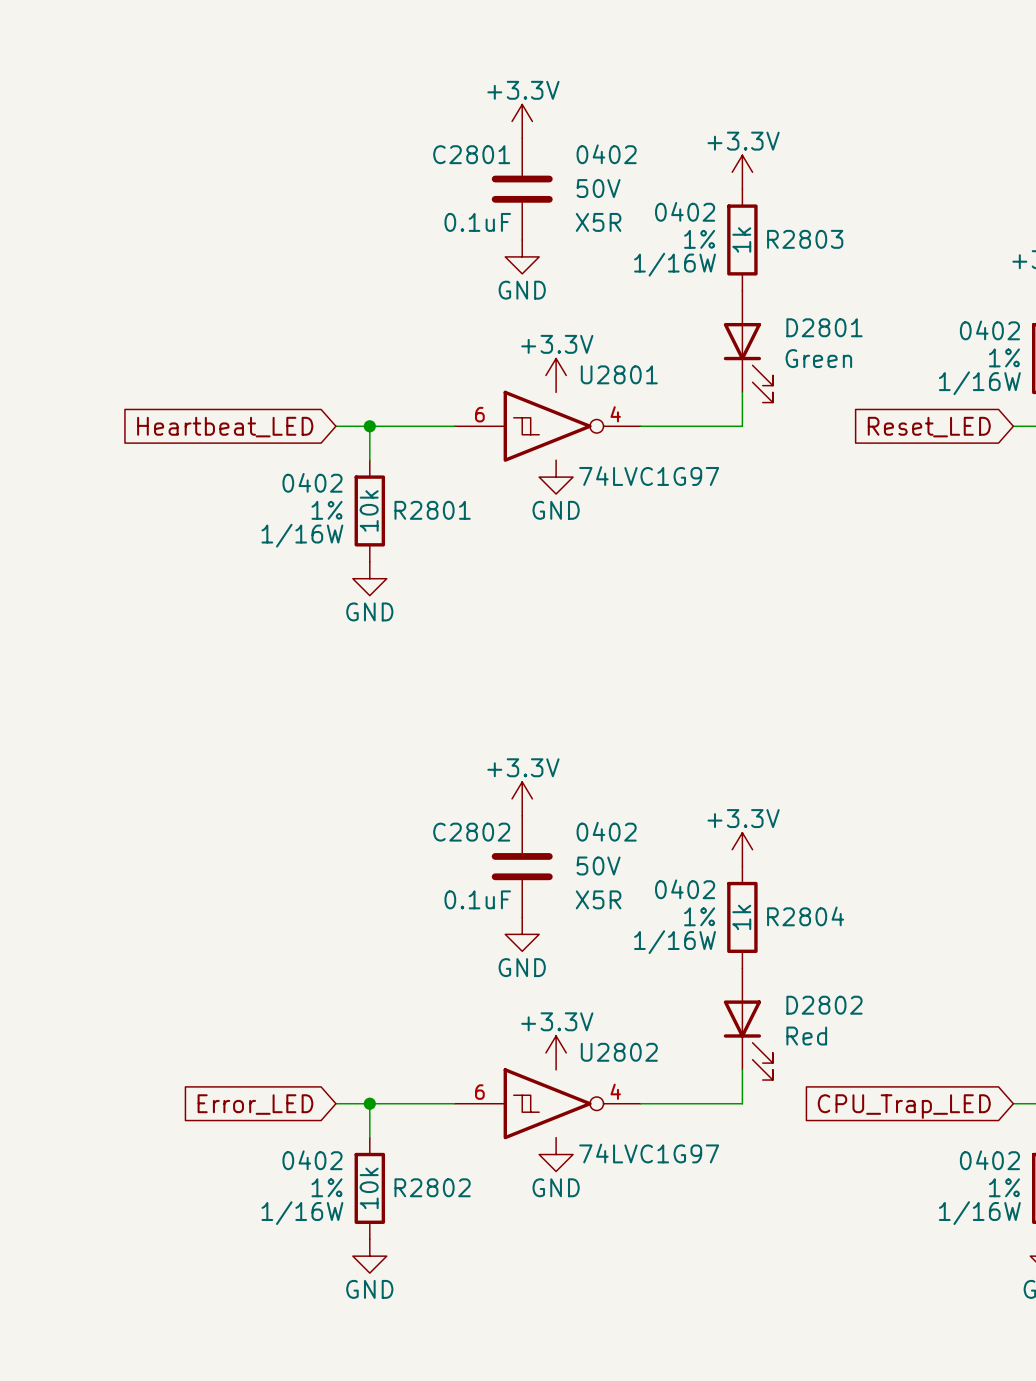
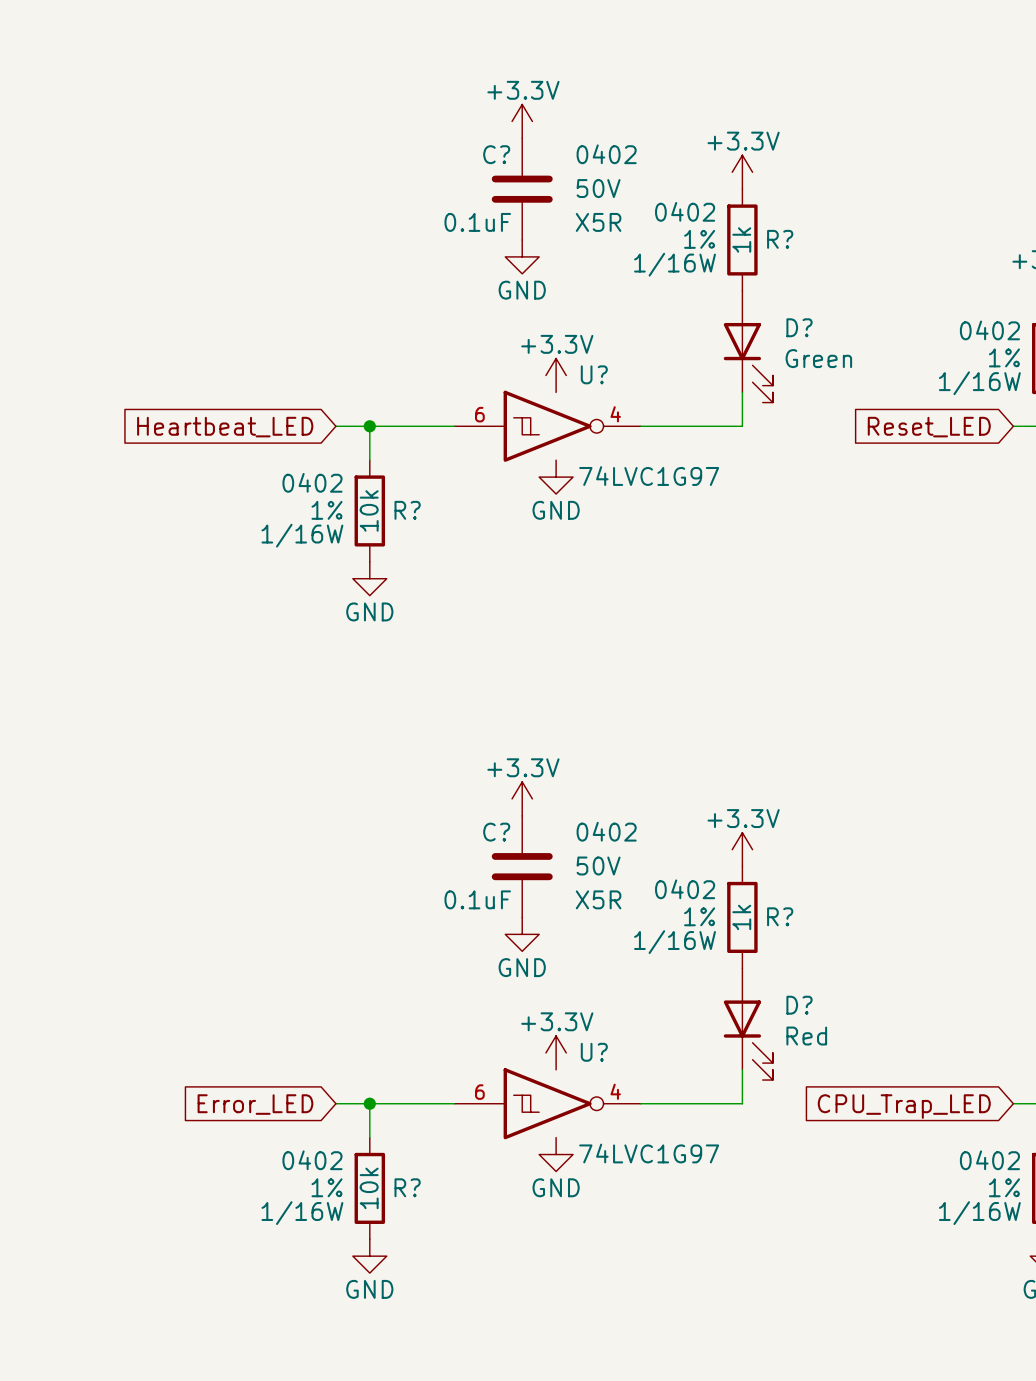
C2801 name: C2801 (471, 154) -> C? (496, 154)
R2803 name: R2803 (805, 239) -> R? (780, 239)
D2801 name: D2801 (824, 327) -> D? (799, 327)
U2801 name: U2801 (619, 374) -> U? (594, 374)
R2801 name: R2801 (432, 510) -> R? (407, 510)
C2802 name: C2802 (471, 832) -> C? (496, 832)
R2804 name: R2804 (805, 916) -> R? (780, 916)
D2802 name: D2802 (824, 1005) -> D? (799, 1005)
U2802 name: U2802 (619, 1052) -> U? (594, 1052)
R2802 name: R2802 (432, 1187) -> R? (407, 1187)

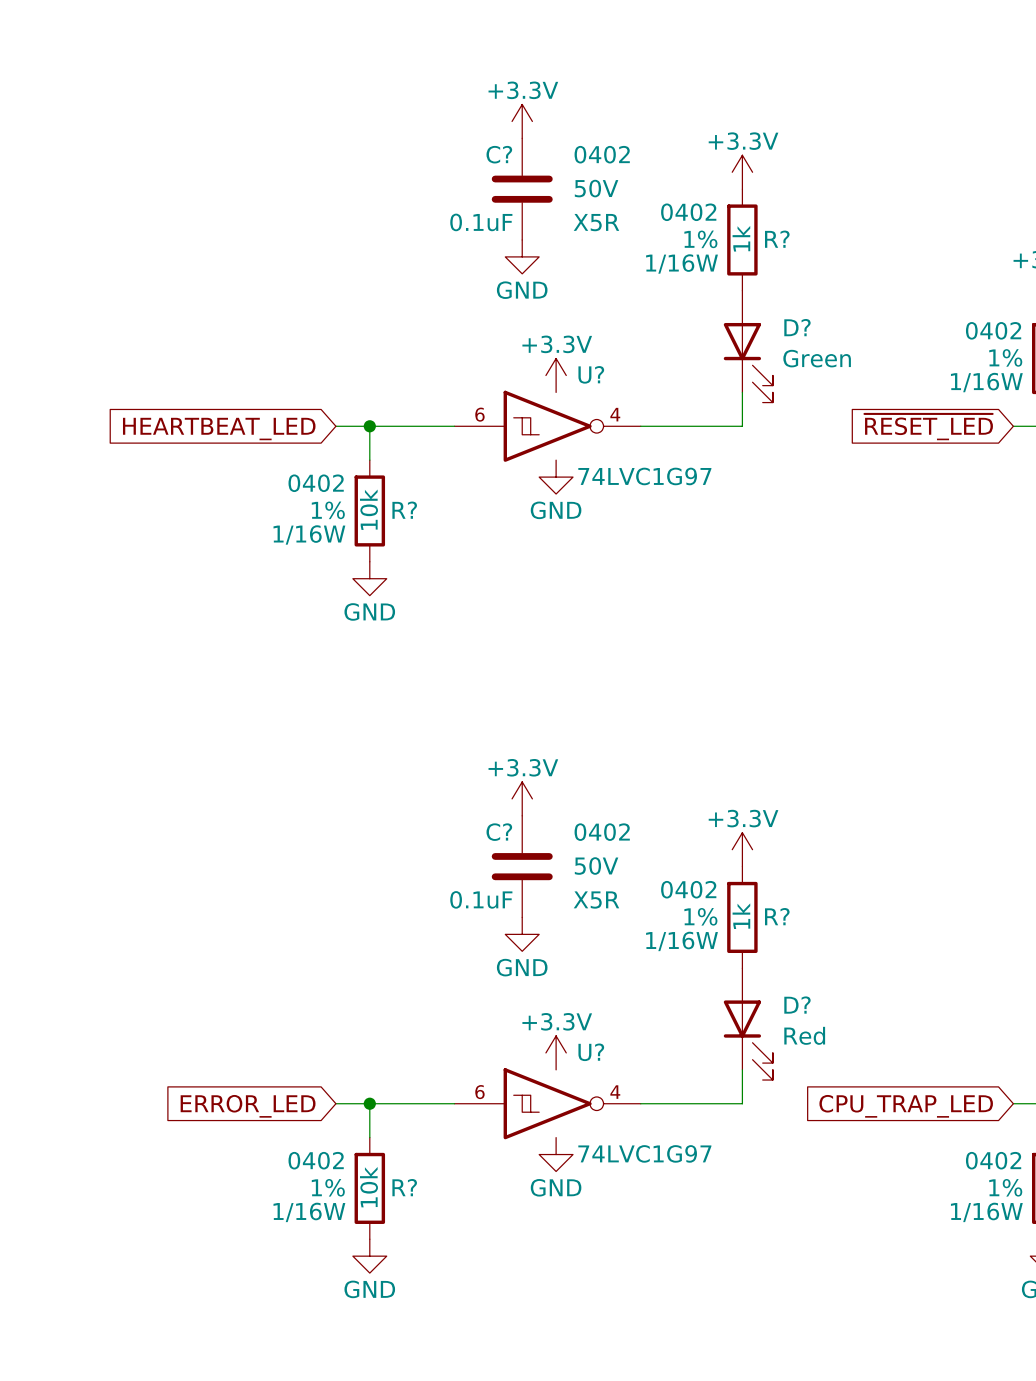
global label: Heartbeat_LED (225, 427) -> HEARTBEAT_LED (219, 429)
global label: Reset_LED (929, 427) -> ~{RESET_LED} (928, 427)
global label: Error_LED (255, 1104) -> ERROR_LED (248, 1106)
global label: CPU_Trap_LED (904, 1106) -> CPU_TRAP_LED (906, 1106)

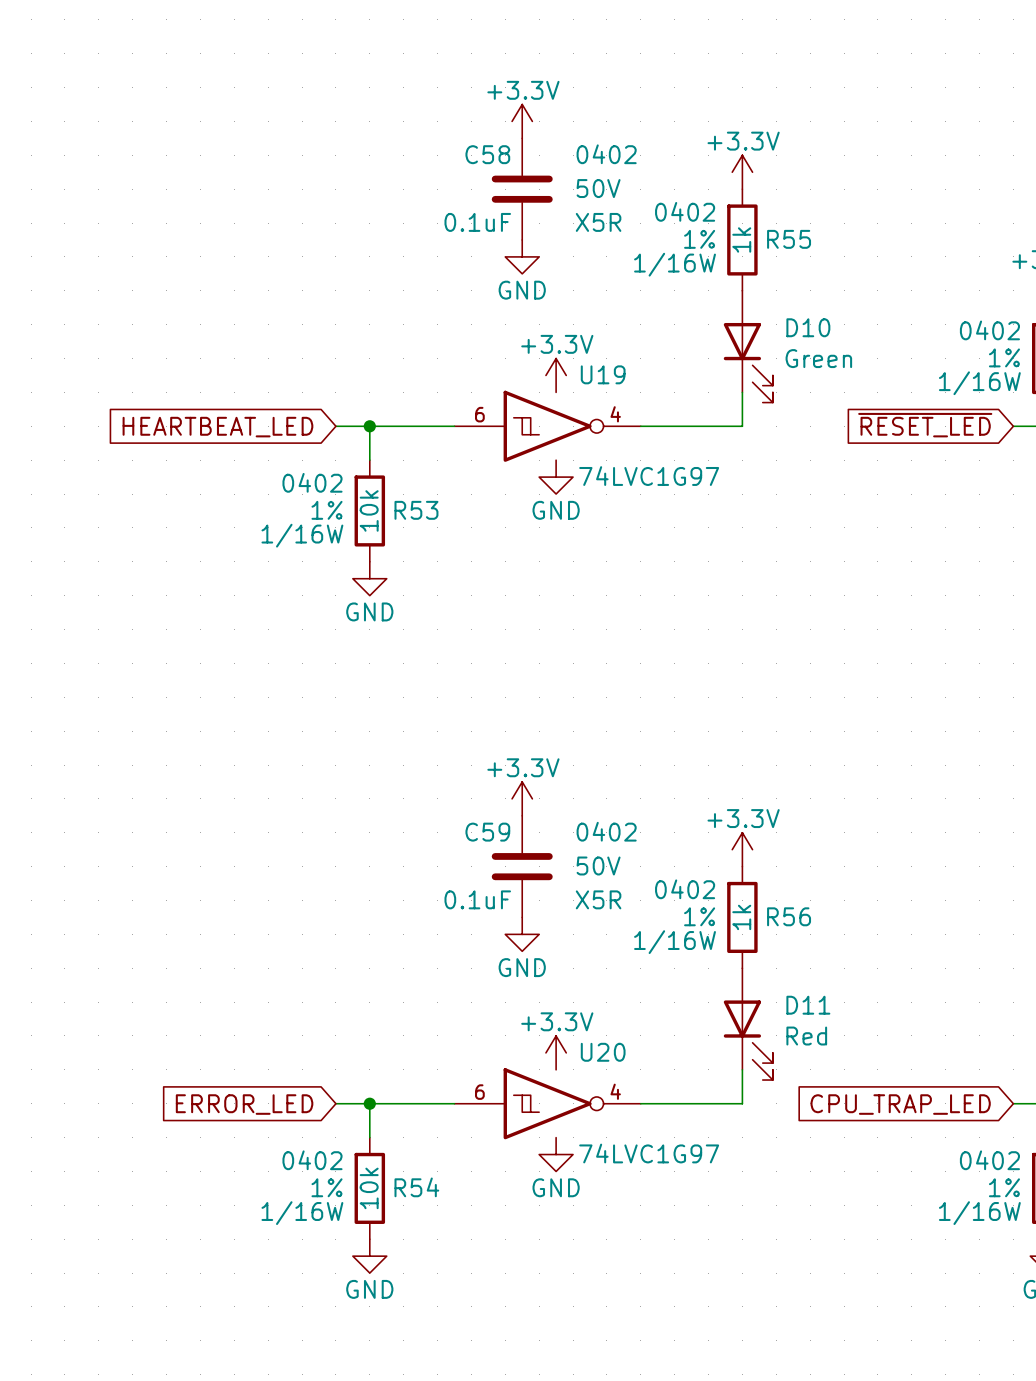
C? name: C? (499, 154) -> C58 (487, 154)
R? name: R? (777, 239) -> R55 (789, 239)
D? name: D? (797, 327) -> D10 (808, 327)
U? name: U? (591, 374) -> U19 (603, 374)
R? name: R? (404, 510) -> R53 (416, 510)
C? name: C? (499, 832) -> C59 (487, 832)
R? name: R? (777, 916) -> R56 (789, 916)
D? name: D? (797, 1005) -> D11 (808, 1005)
U? name: U? (591, 1052) -> U20 (603, 1052)
R? name: R? (404, 1187) -> R54 (416, 1187)

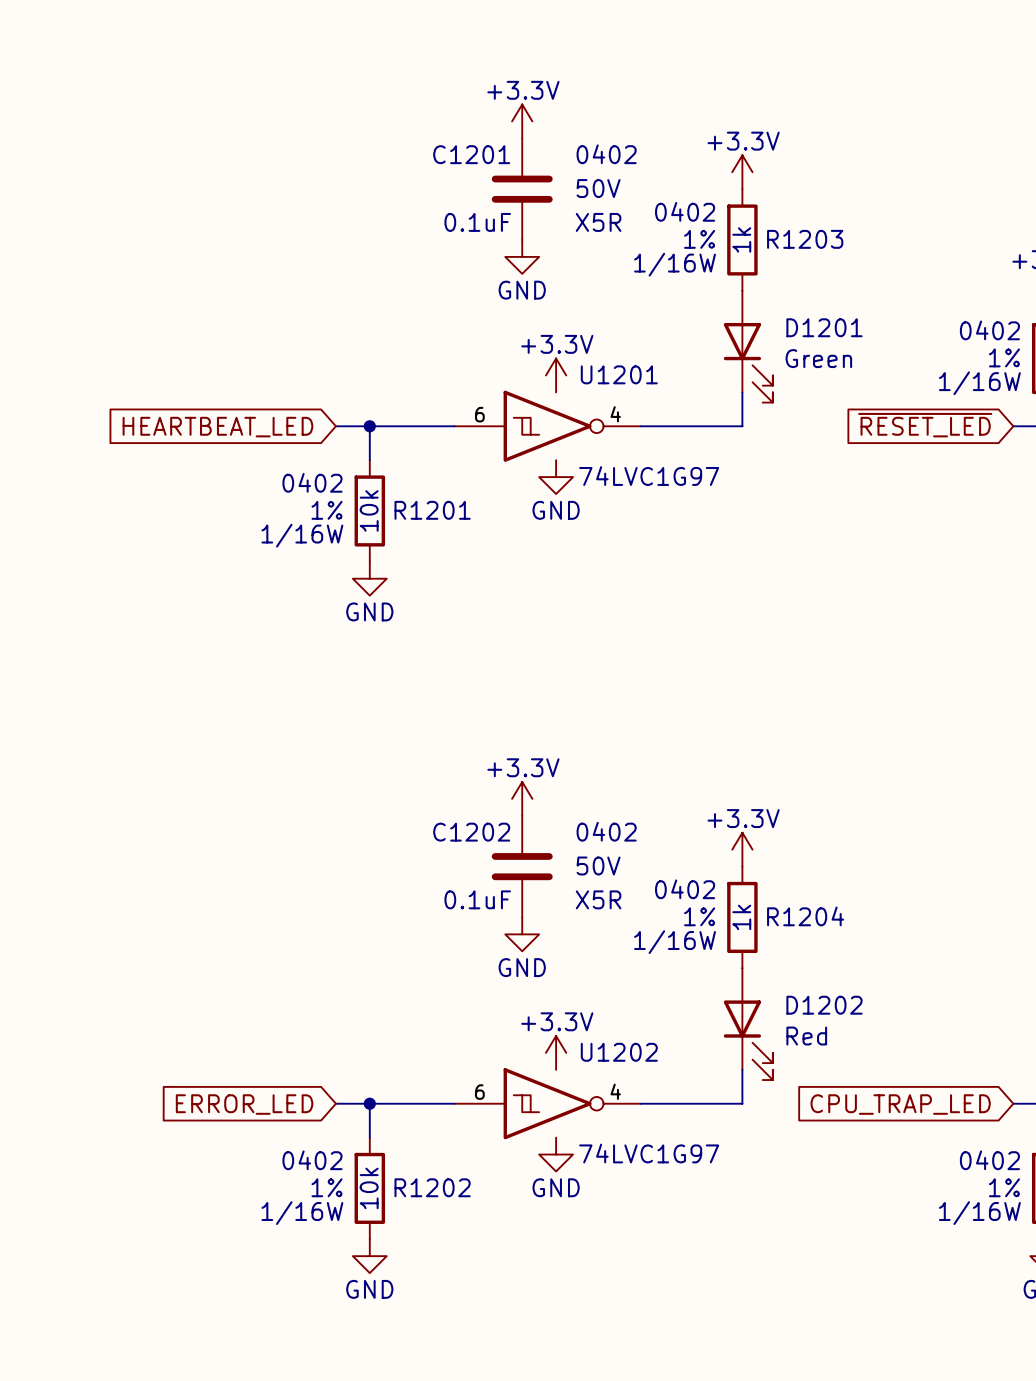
C58 name: C58 (487, 154) -> C1201 (471, 154)
R55 name: R55 (789, 239) -> R1203 (805, 239)
D10 name: D10 (808, 327) -> D1201 (824, 327)
U19 name: U19 (603, 374) -> U1201 (619, 374)
R53 name: R53 (416, 510) -> R1201 (432, 510)
C59 name: C59 (487, 832) -> C1202 (471, 832)
R56 name: R56 (789, 916) -> R1204 (805, 916)
D11 name: D11 (808, 1005) -> D1202 (824, 1005)
U20 name: U20 (603, 1052) -> U1202 (619, 1052)
R54 name: R54 (416, 1187) -> R1202 (432, 1187)

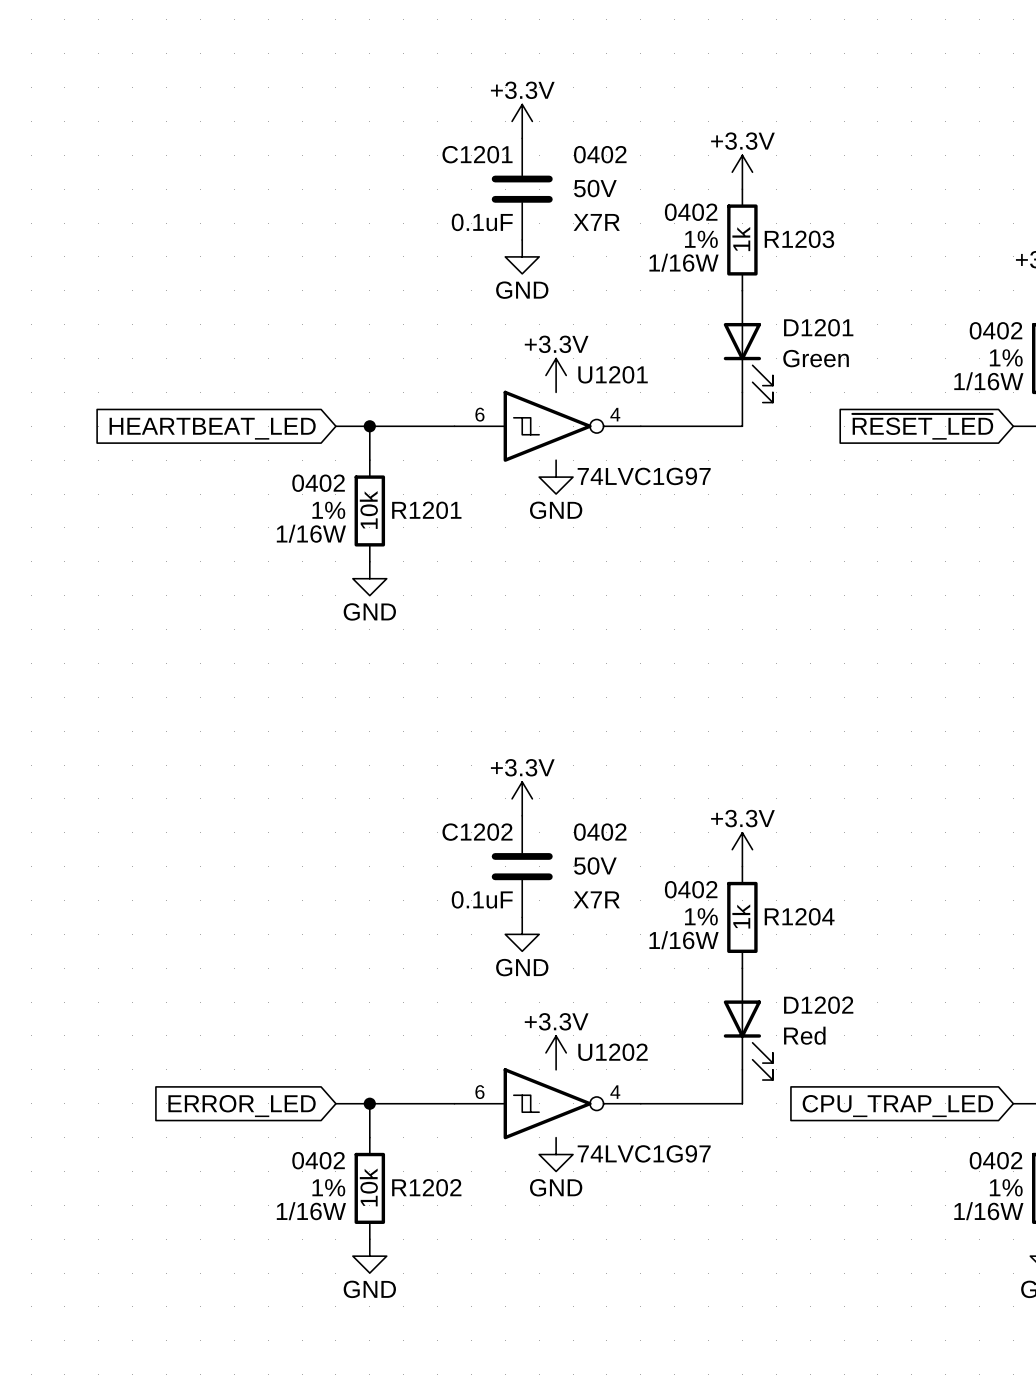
C1201 text: X5R (598, 222) -> X7R (596, 222)
C1202 text: X5R (598, 899) -> X7R (596, 899)

